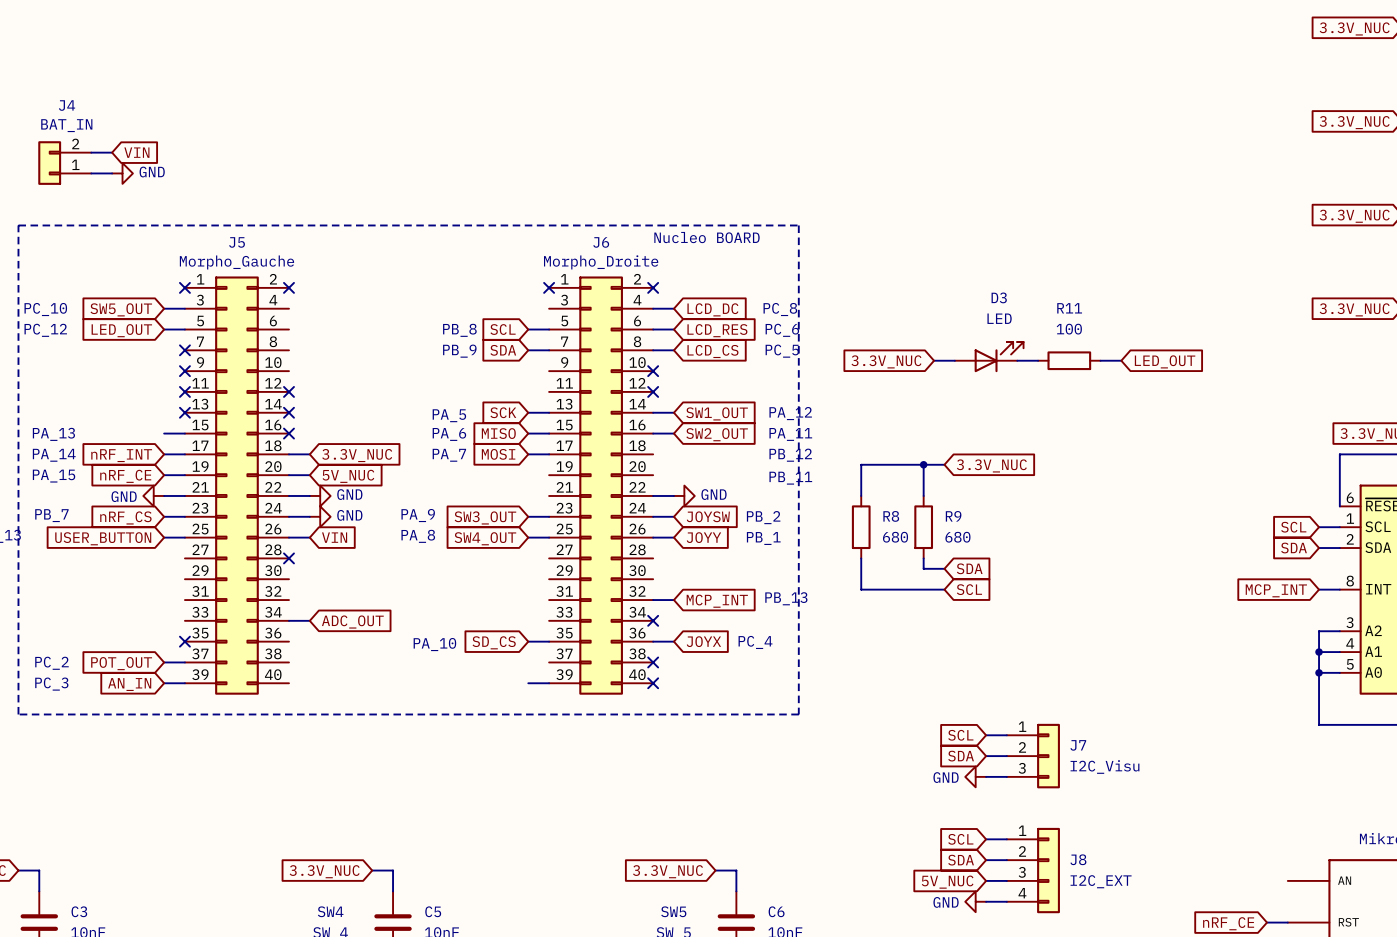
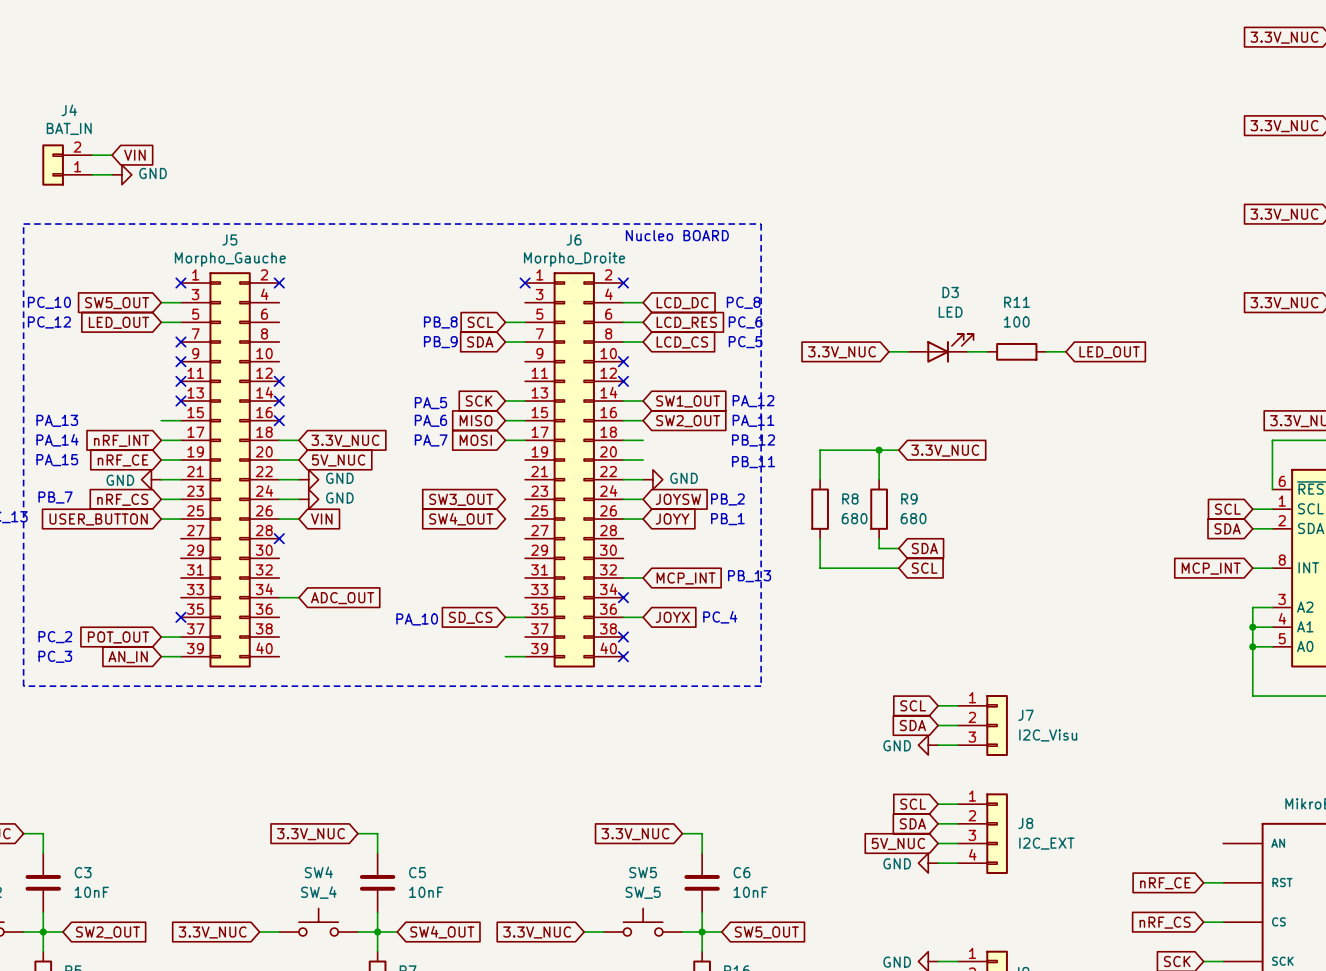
text: PA_9 (418, 515) -> none
wire: (528, 516) (549, 516) -> (623, 440) (643, 440)
text: PA_8 (418, 536) -> none
wire: (528, 537) (549, 537) -> (623, 460) (643, 460)

